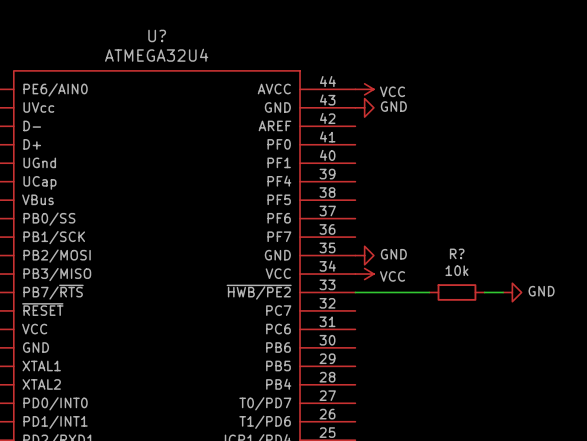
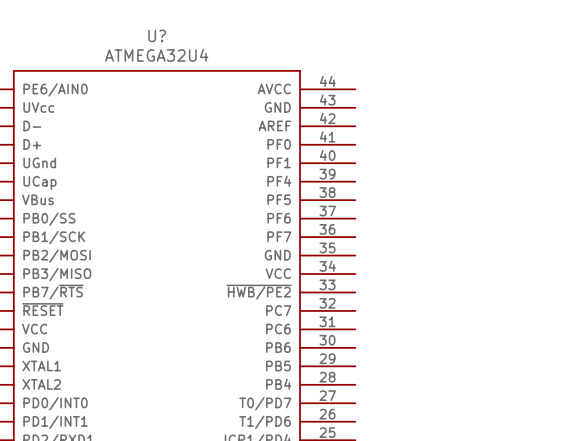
power symbol: VCC (364, 89) -> none
power symbol: GND (364, 107) -> none
power symbol: GND (364, 255) -> none
power symbol: VCC (364, 274) -> none
wire: (355, 292) (429, 292) -> none
R?: 10k (456, 292) -> none
wire: (484, 292) (503, 292) -> none
power symbol: GND (512, 292) -> none

